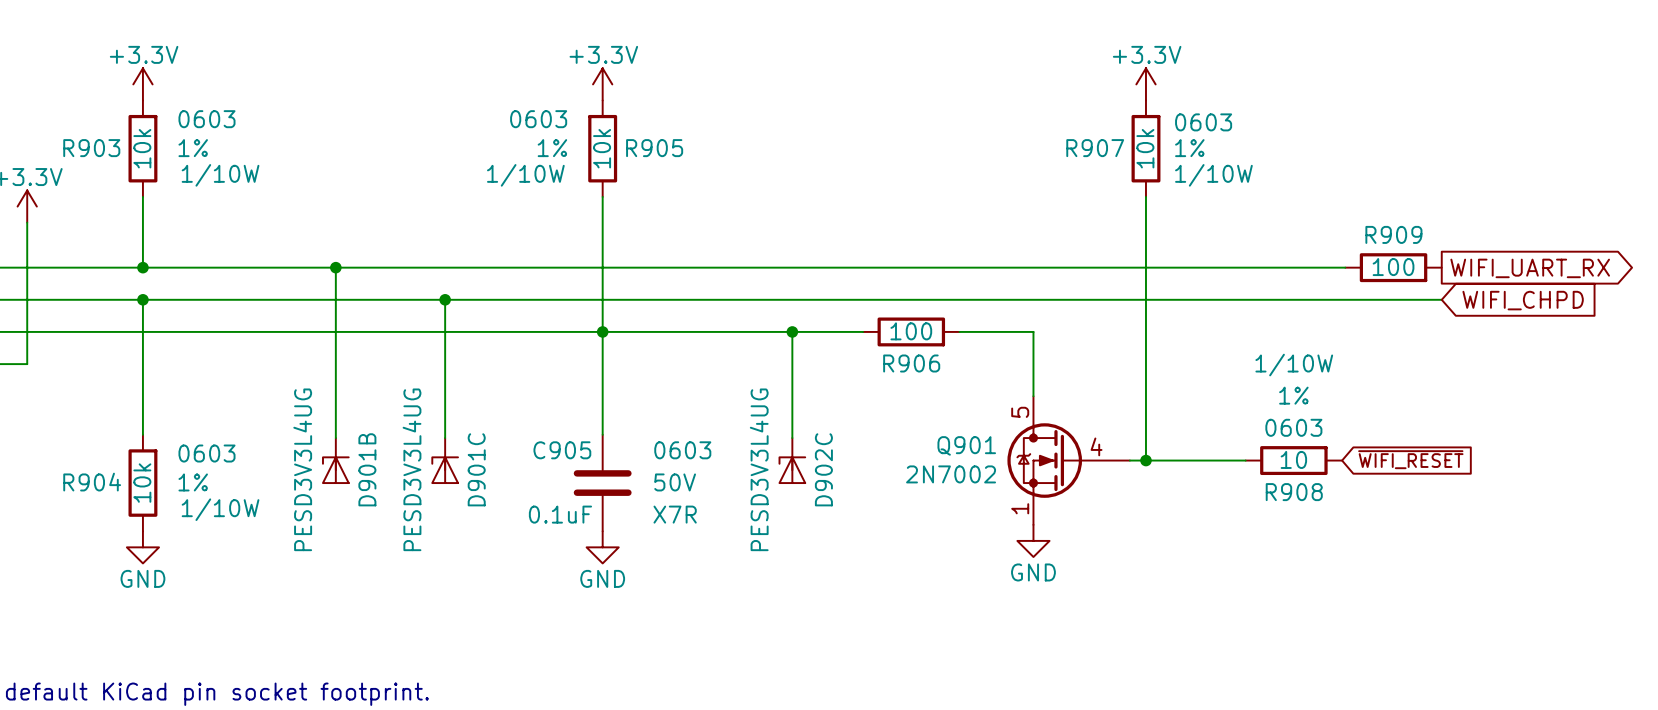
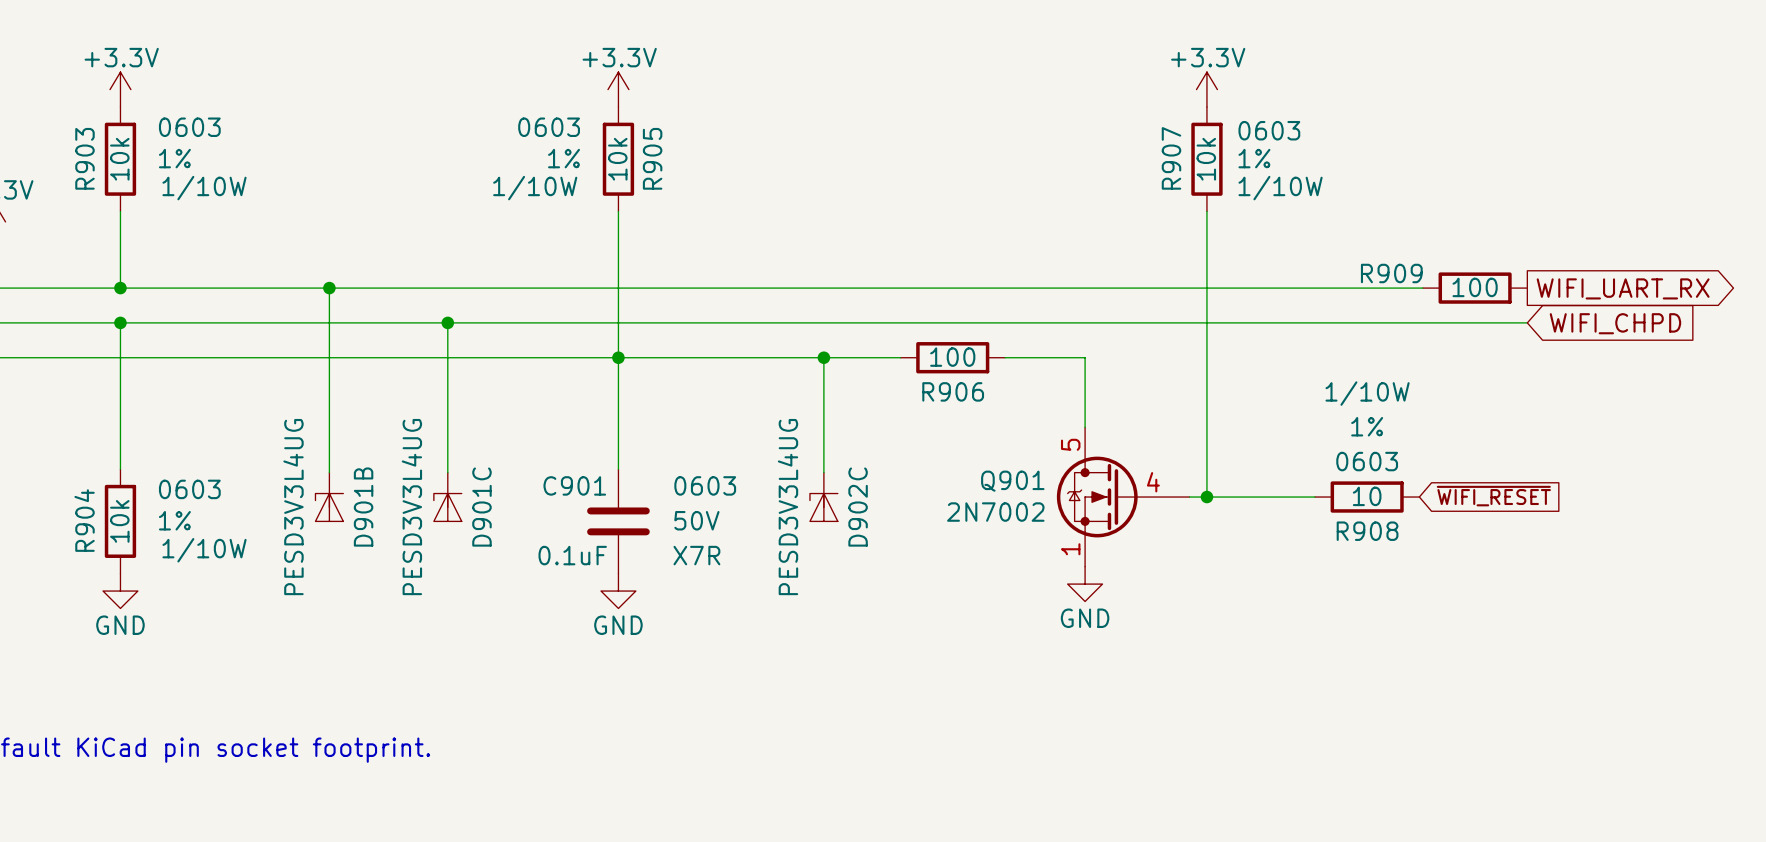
R903 name rotation: 0° (91, 148) -> 90° counterclockwise (84, 158)
R905 name rotation: 0° (654, 148) -> 90° counterclockwise (652, 158)
R907 name rotation: 0° (1095, 148) -> 90° counterclockwise (1171, 158)
R909 name position: R909 (1393, 234) -> R909 (1391, 273)
C905 name: C905 (562, 450) -> C901 (574, 485)
R904 name rotation: 0° (92, 482) -> 90° counterclockwise (84, 520)

